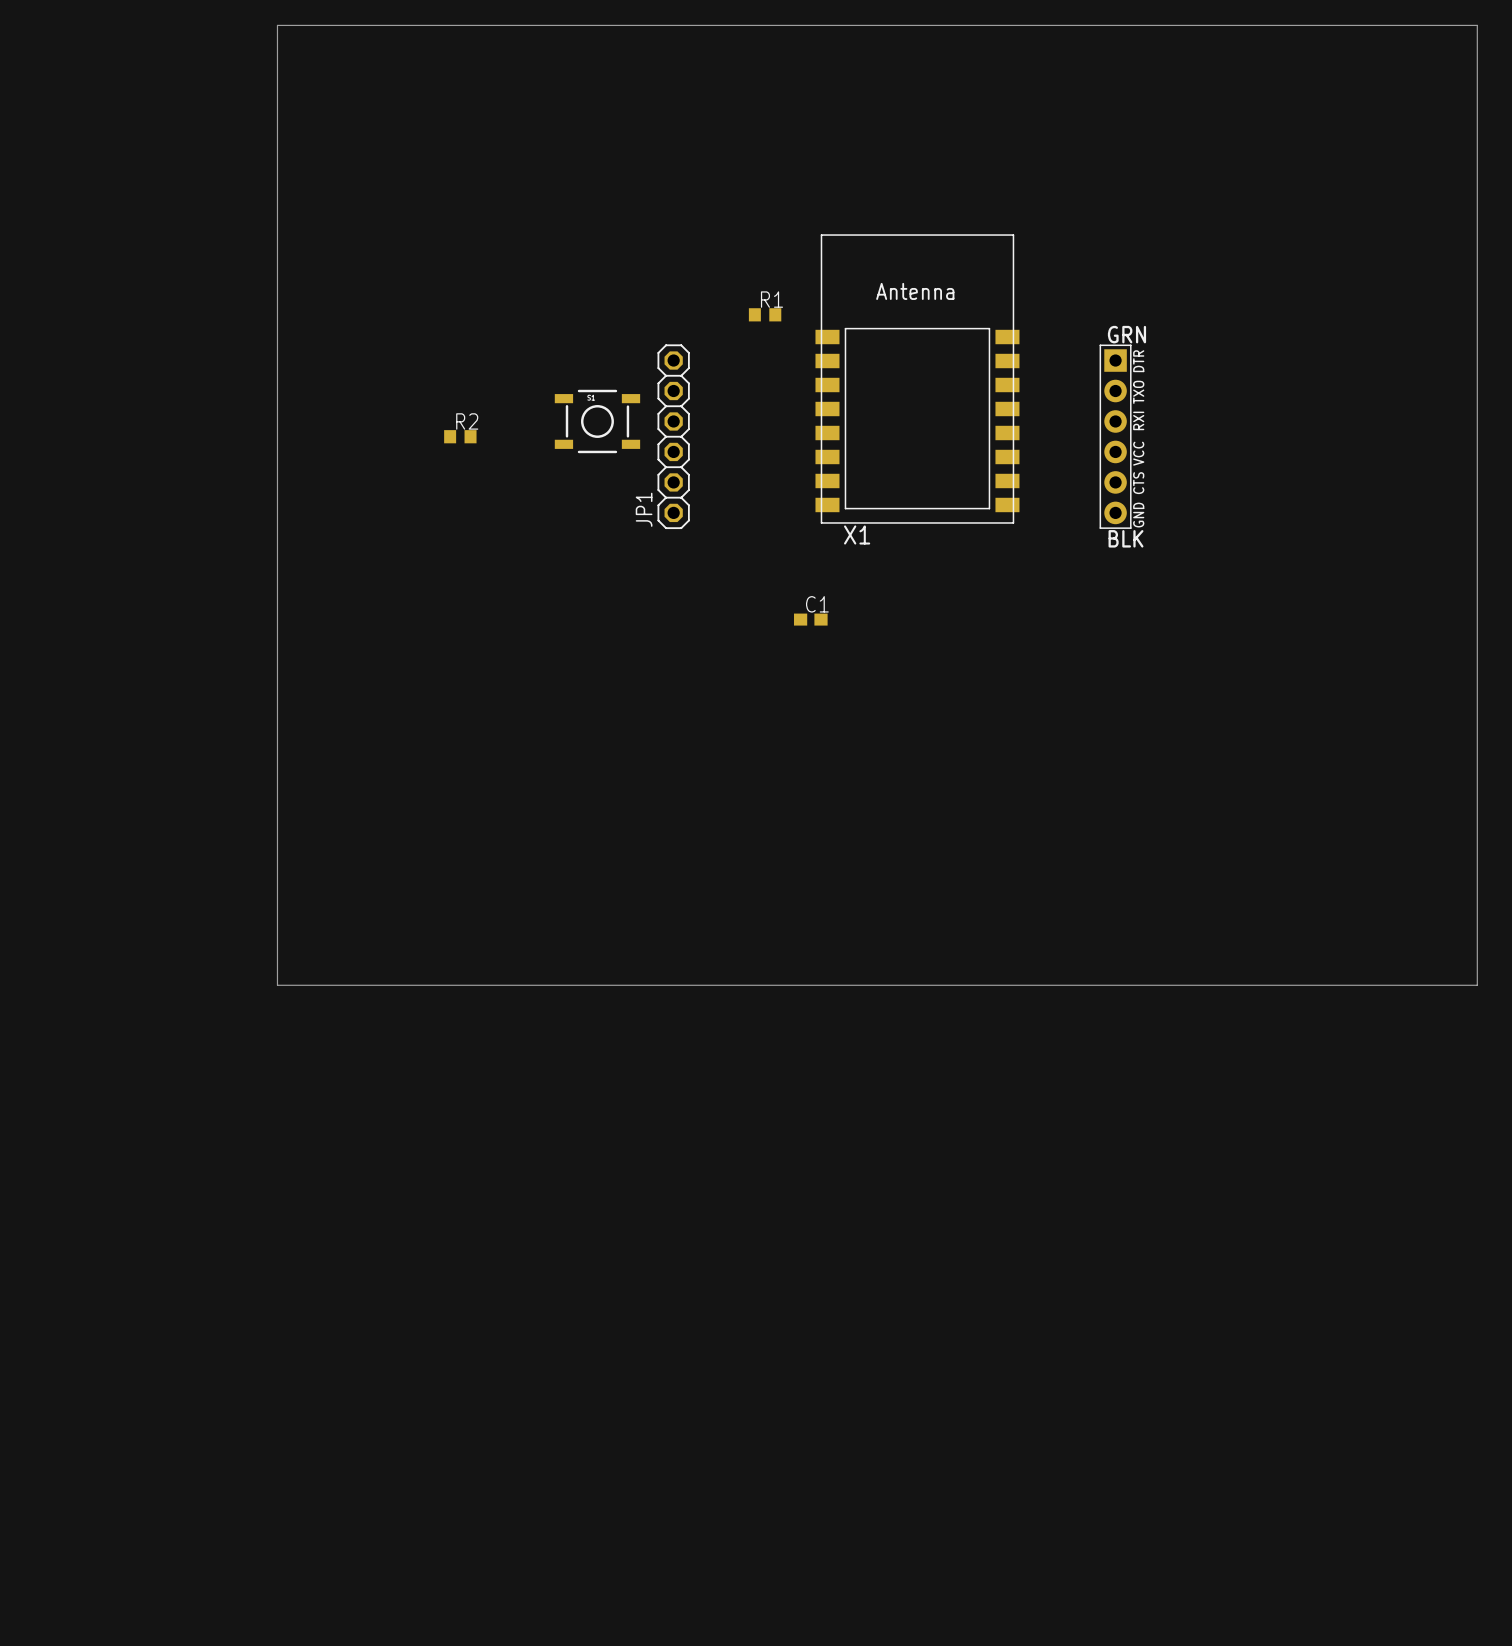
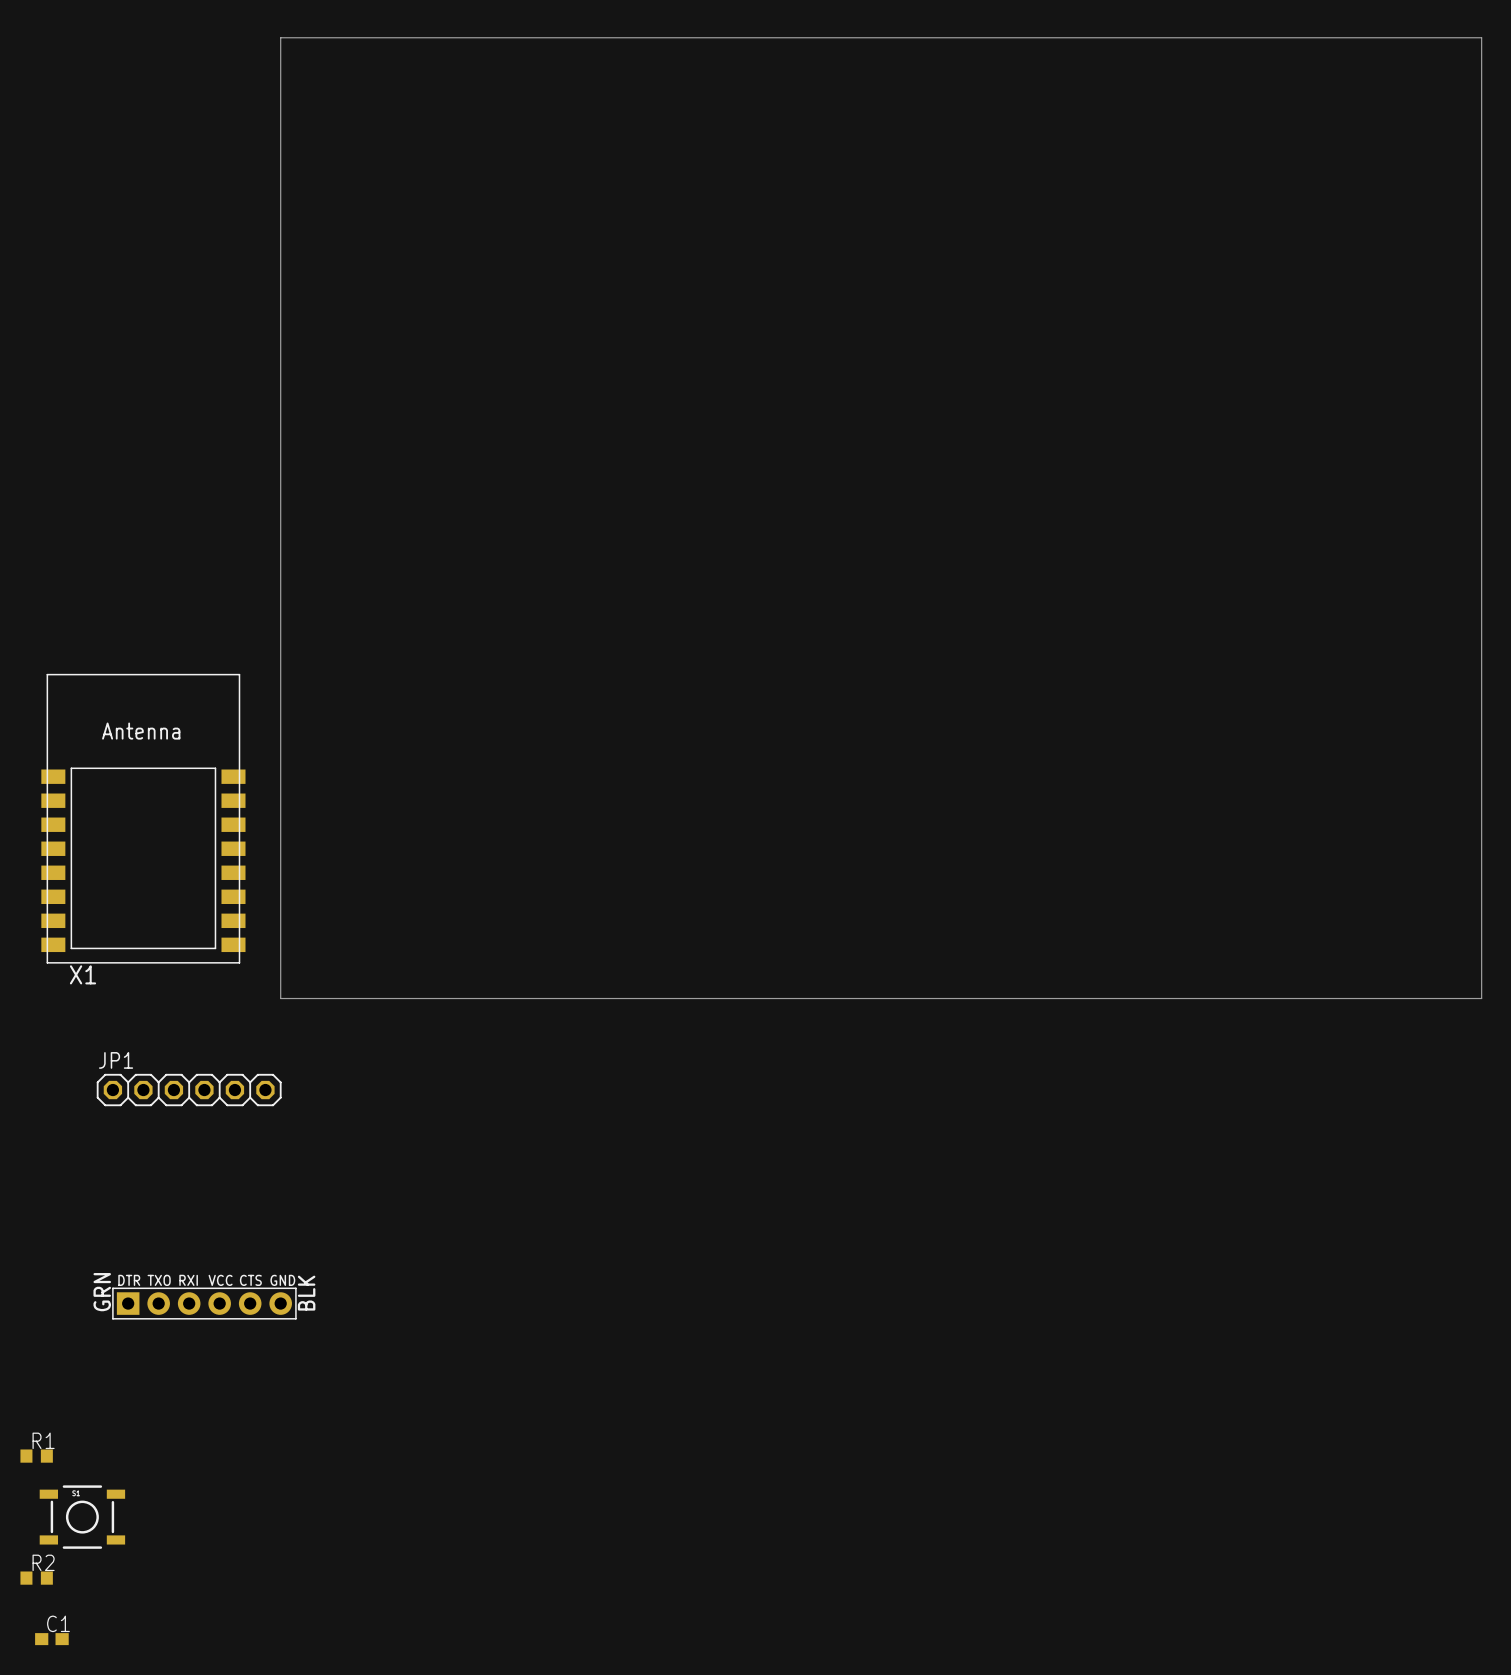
R1 position: (765, 314) -> (36, 1456)
X1 position: (917, 379) -> (143, 818)
part position: (597, 421) -> (82, 1517)
R2 position: (460, 436) -> (36, 1578)
JP1 rotation: 0° (673, 436) -> 90° clockwise (189, 1090)
JP1 position: (673, 436) -> (189, 1090)
part: (1115, 436) -> none
C1 position: (810, 619) -> (51, 1639)
part: none -> (204, 1303)

